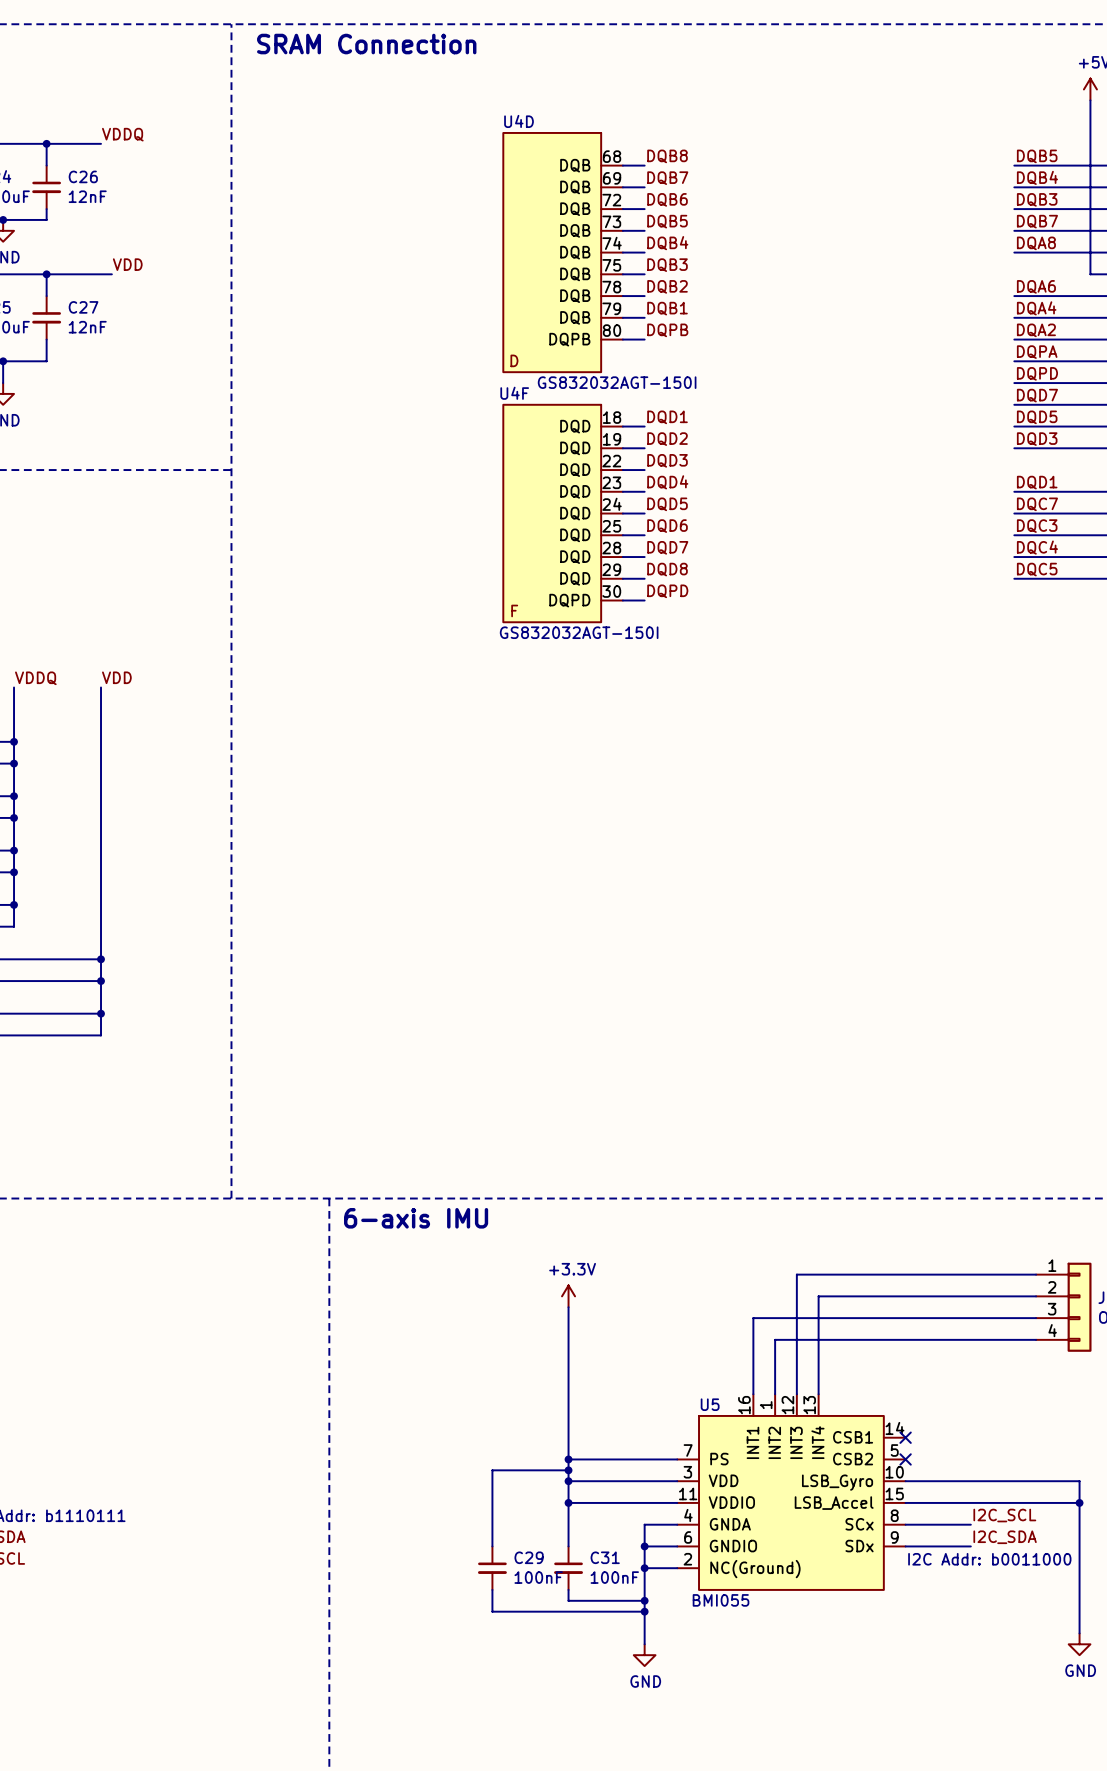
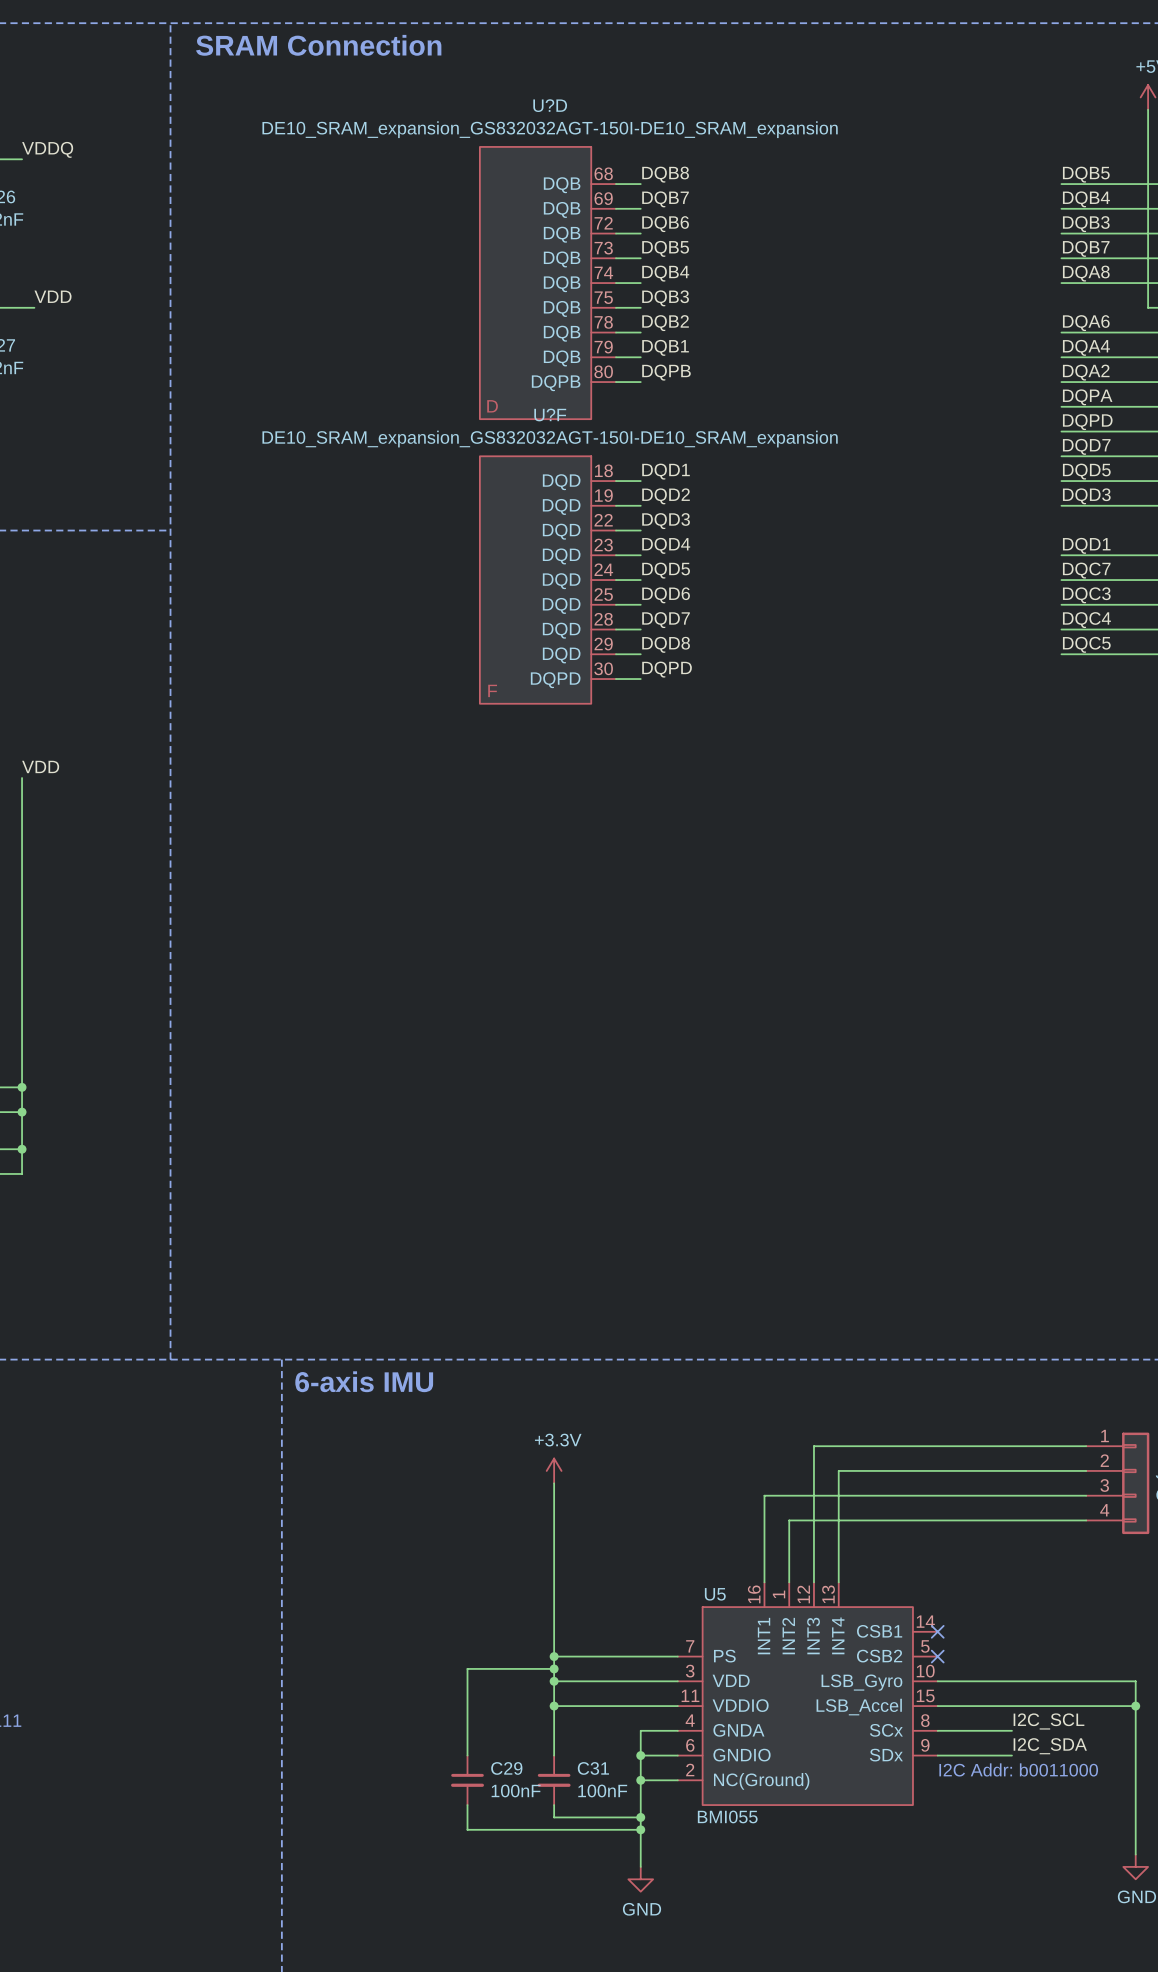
U4D name: U4D (519, 121) -> U?D (550, 105)
U4D value: GS832032AGT-150I (617, 382) -> DE10_SRAM_expansion_GS832032AGT-150I-DE10_SRAM_expansion (550, 129)
U4F name: U4F (514, 393) -> U?F (550, 414)
U4F value: GS832032AGT-150I (579, 632) -> DE10_SRAM_expansion_GS832032AGT-150I-DE10_SRAM_expansion (550, 439)

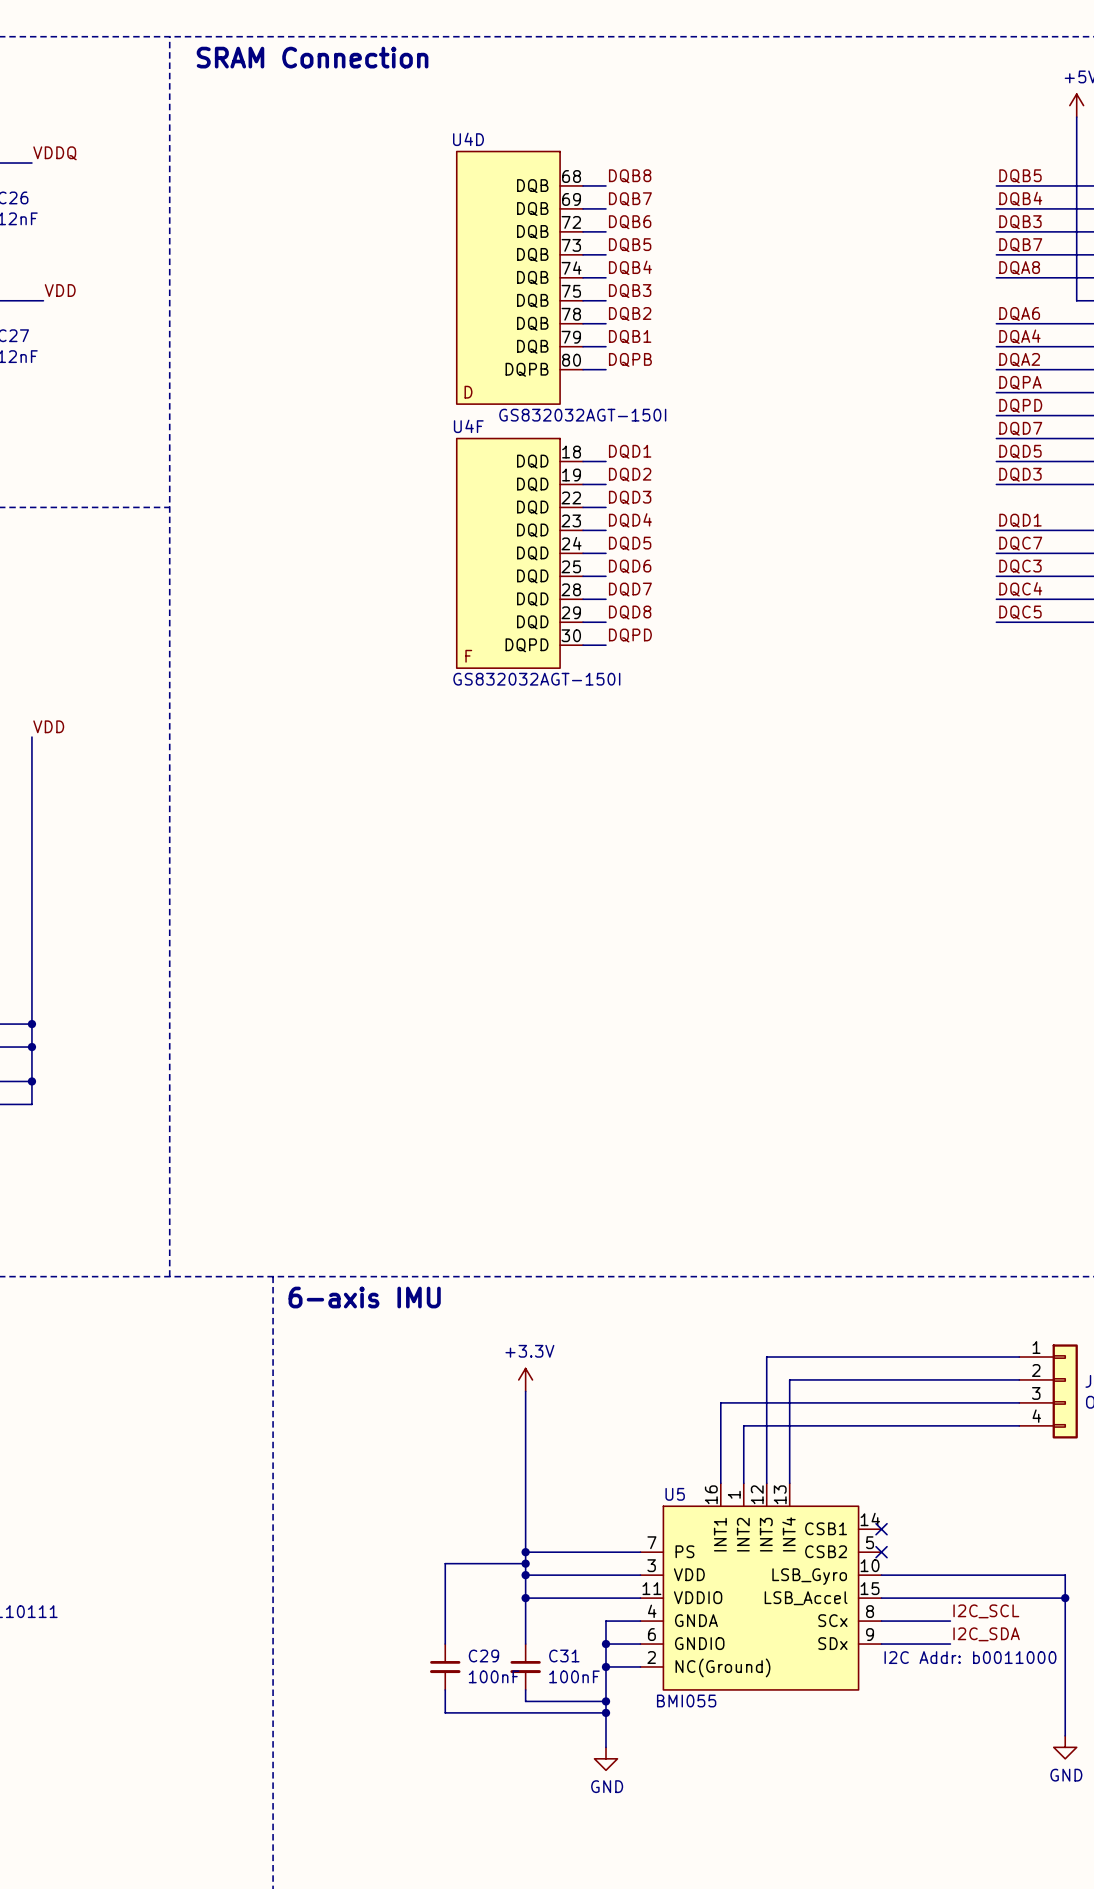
U?D name: U?D (550, 105) -> U4D (468, 139)
U?D value: DE10_SRAM_expansion_GS832032AGT-150I-DE10_SRAM_expansion (550, 129) -> GS832032AGT-150I (582, 415)
U?F name: U?F (550, 414) -> U4F (468, 426)
U?F value: DE10_SRAM_expansion_GS832032AGT-150I-DE10_SRAM_expansion (550, 439) -> GS832032AGT-150I (536, 679)

